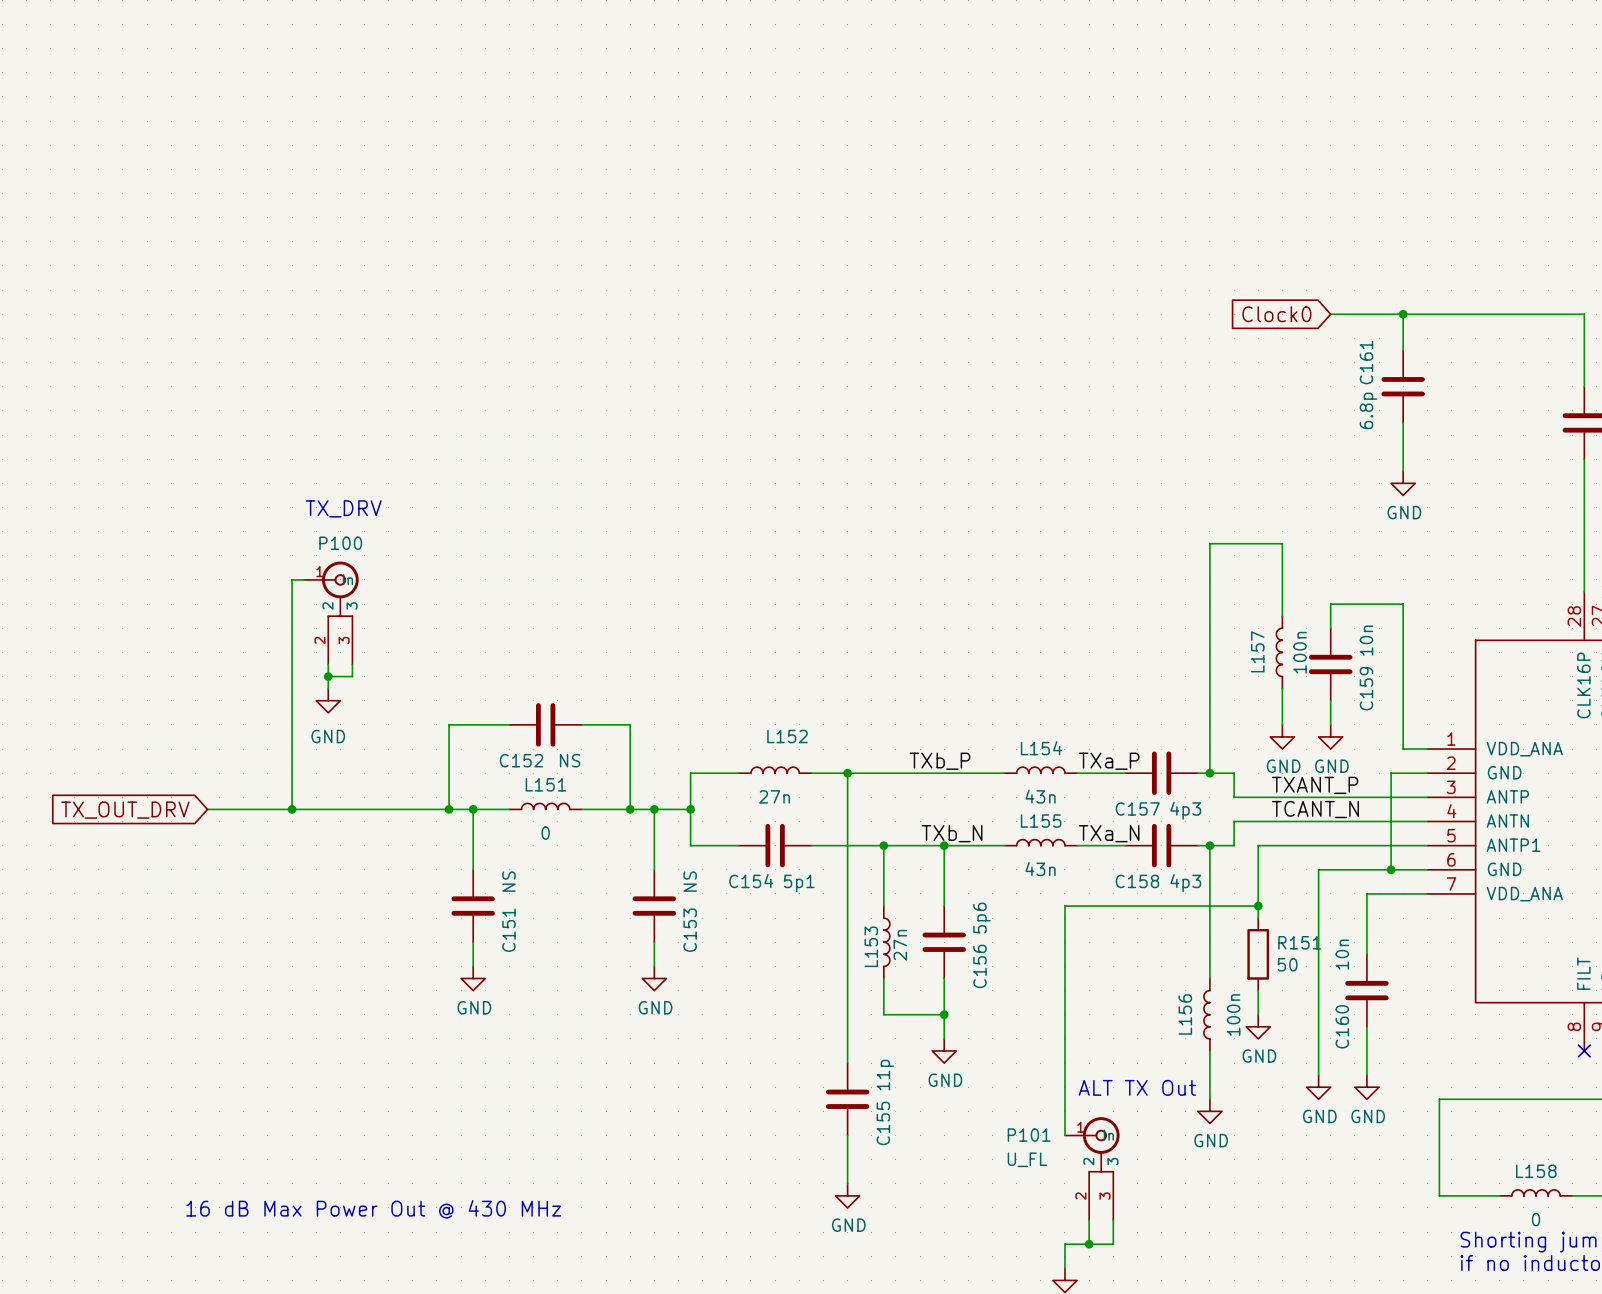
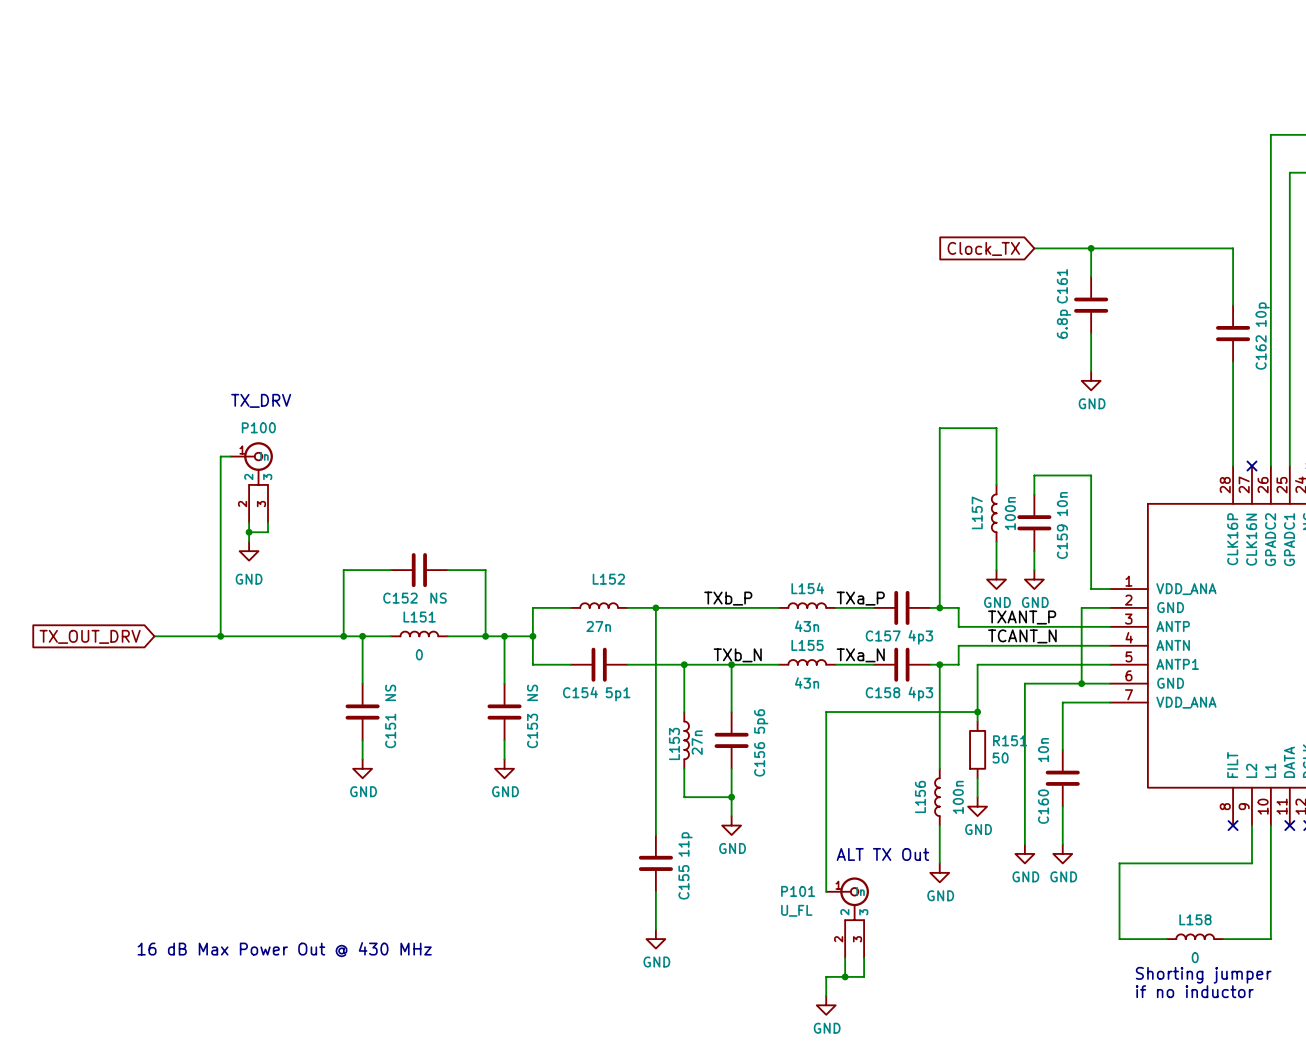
global label: Clock0 (1276, 314) -> Clock_TX (983, 248)

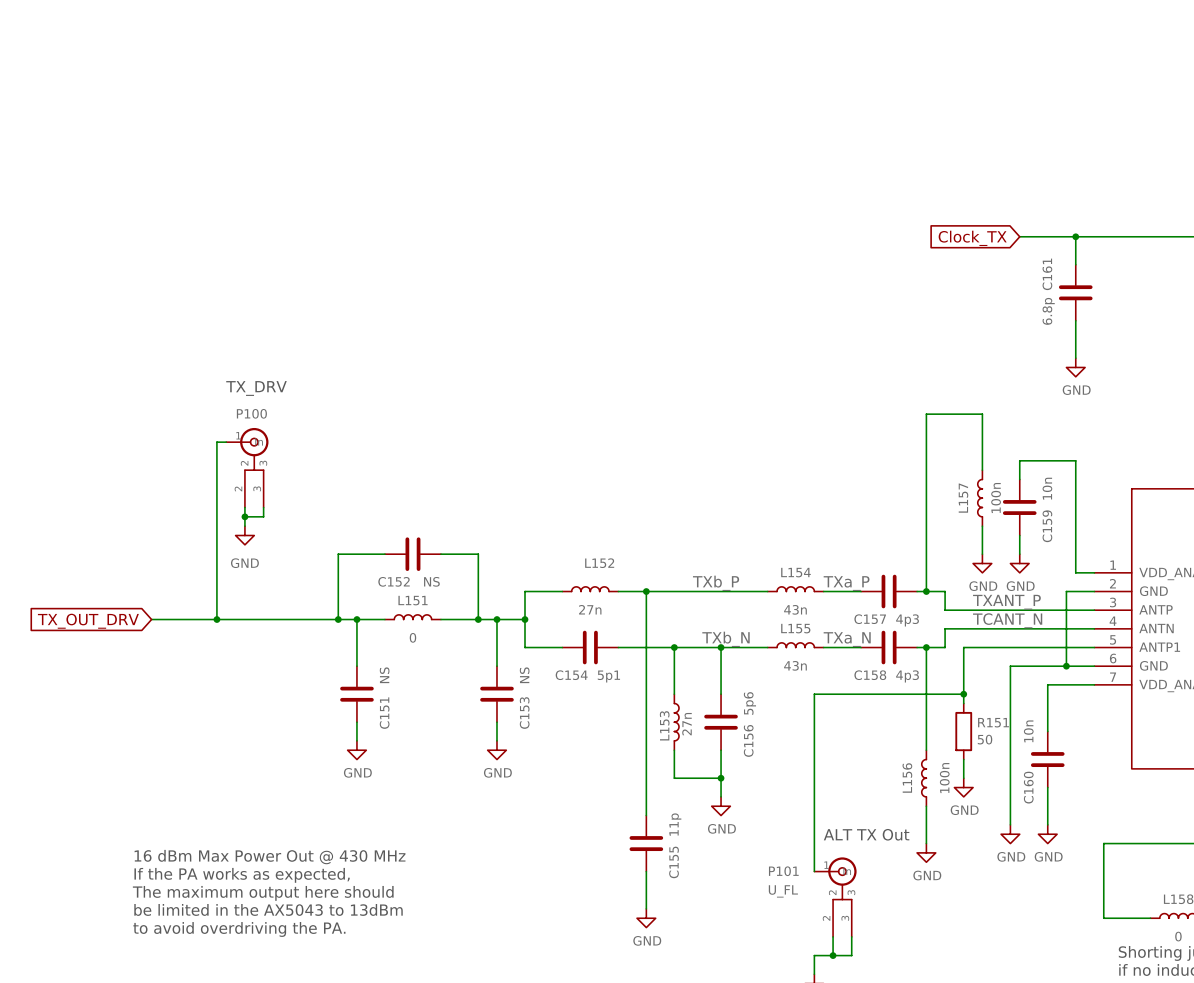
text: none -> 16 dBm Max Power Out @ 430 MHz (270, 857)
text: none -> If the PA works as expected, (242, 875)
text: none -> The maximum output here should (263, 893)
text: none -> be limited in the AX5043 to 13dBm (268, 909)
text: 16 dB Max Power Out @ 430 MHz (284, 949) -> to avoid overdriving the PA. (239, 929)

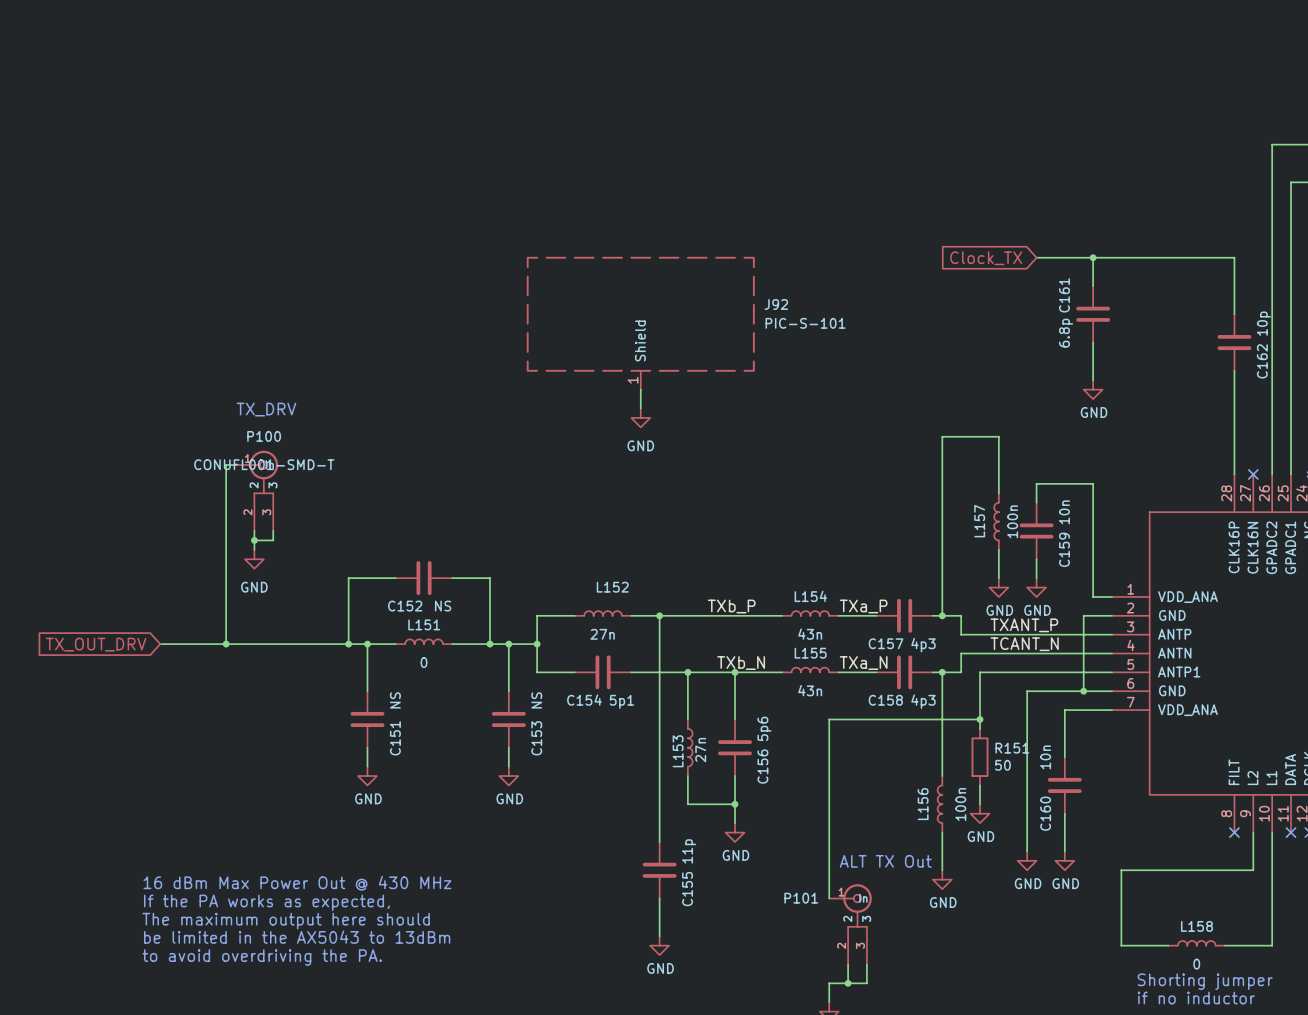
J92: none -> PIC-S-101 (640, 323)
wire: none -> (640, 389) (640, 408)
power symbol: none -> GND (640, 417)
P100 value: none -> CONUFL001-SMD-T (264, 464)
P101 value: U_FL (783, 891) -> none

